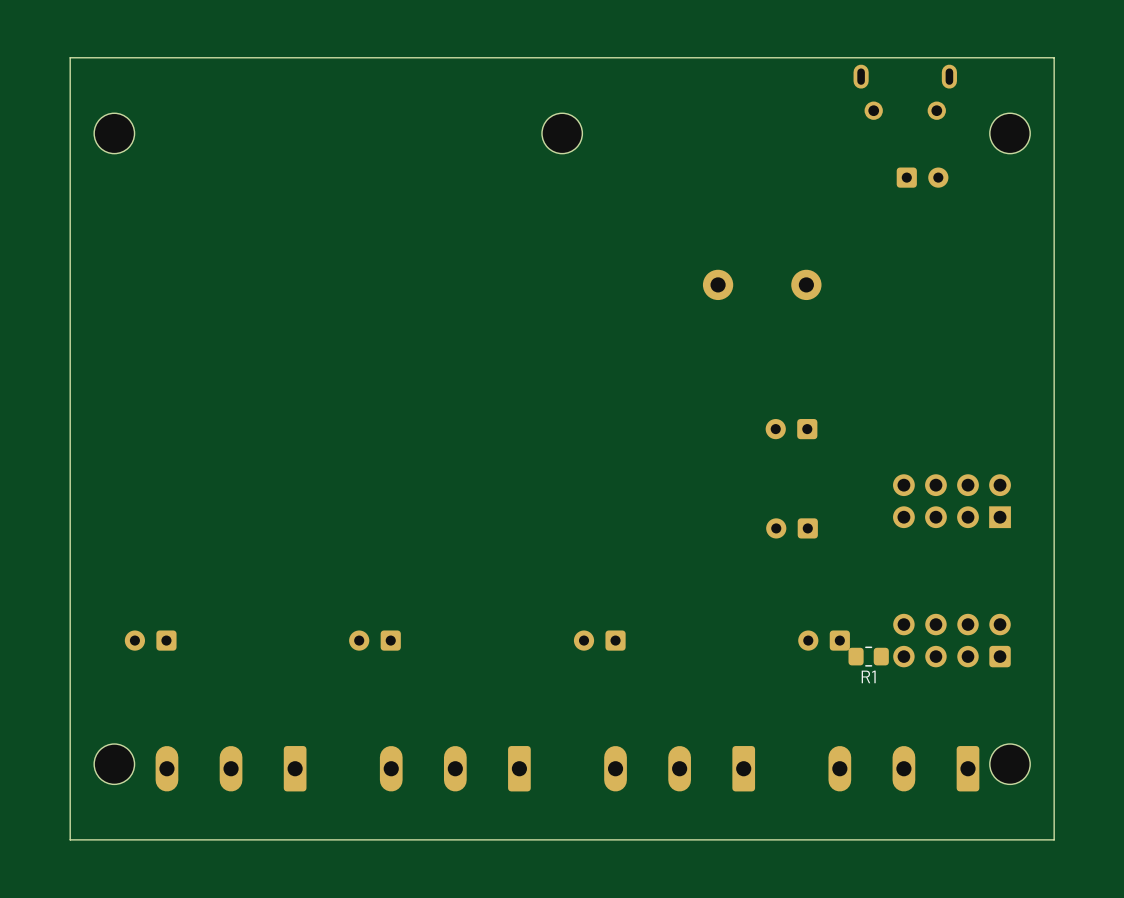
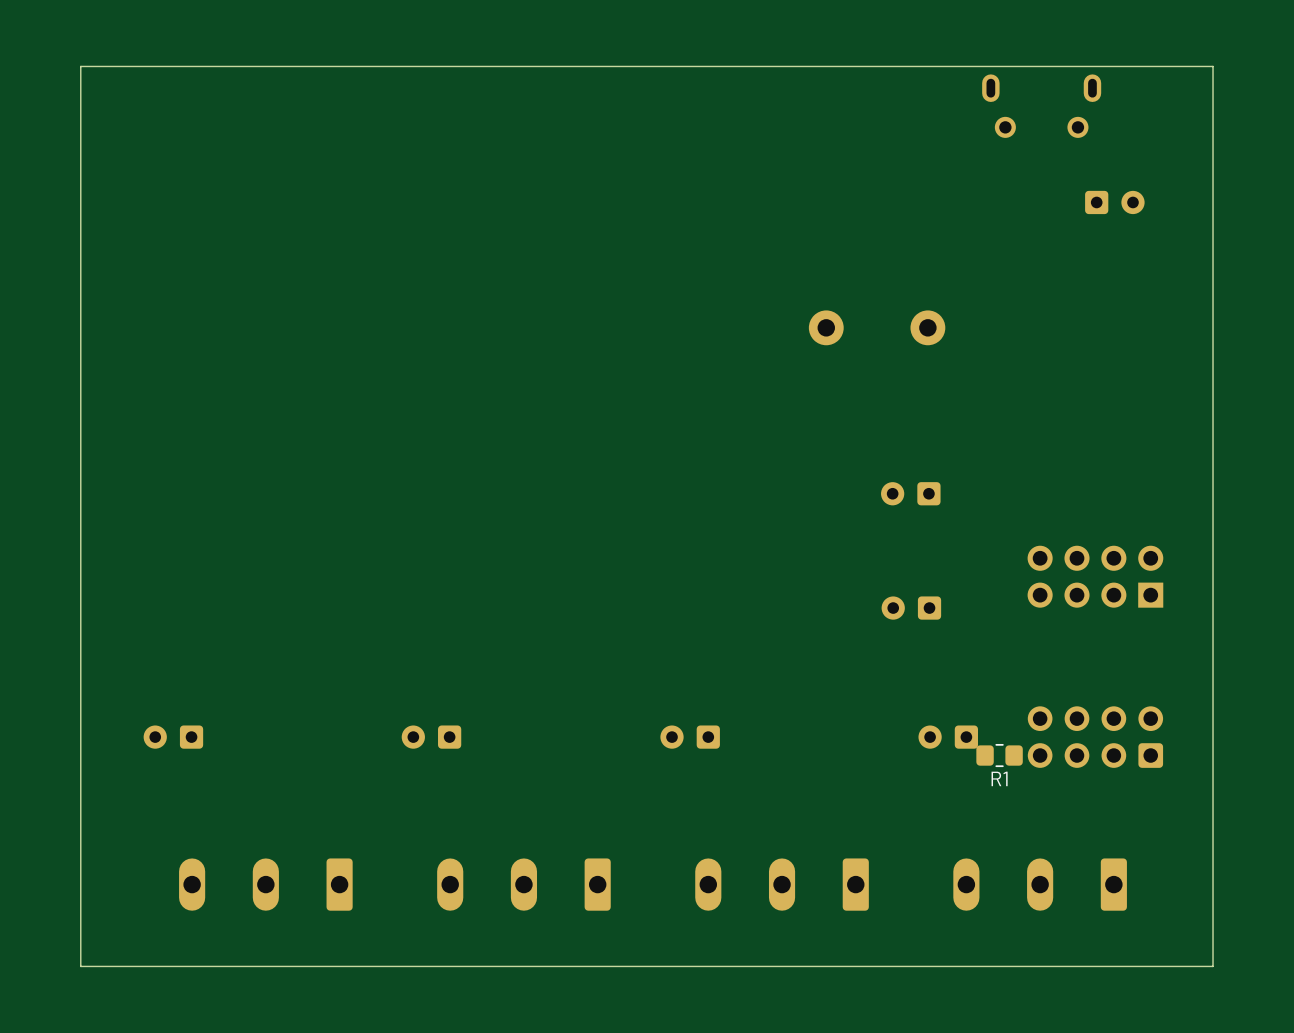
part: (114, 133) -> none
part: (562, 133) -> none
part: (1010, 133) -> none
part position: (922, 177) -> (1114, 202)
part: (114, 764) -> none
part: (1010, 764) -> none

